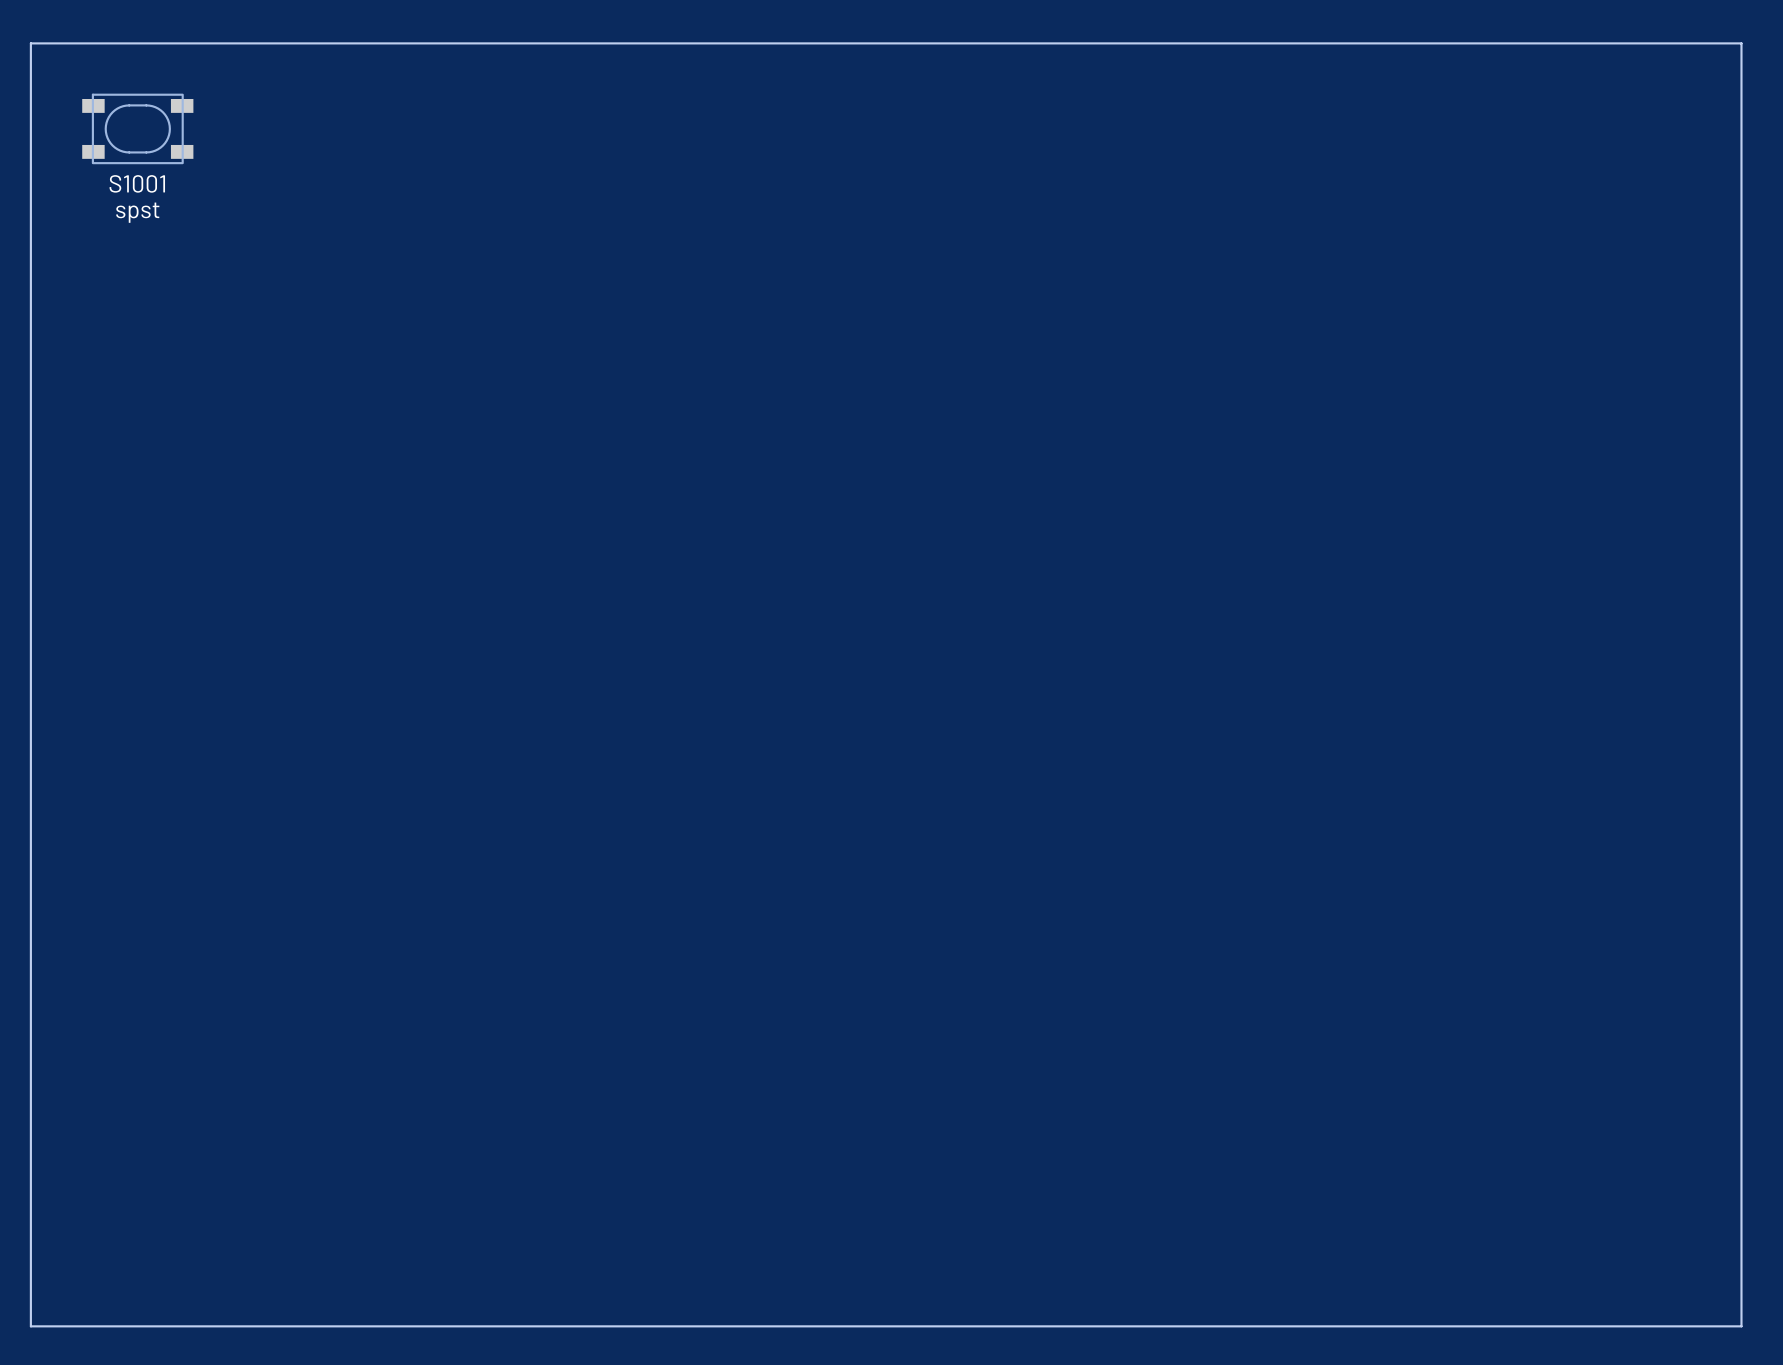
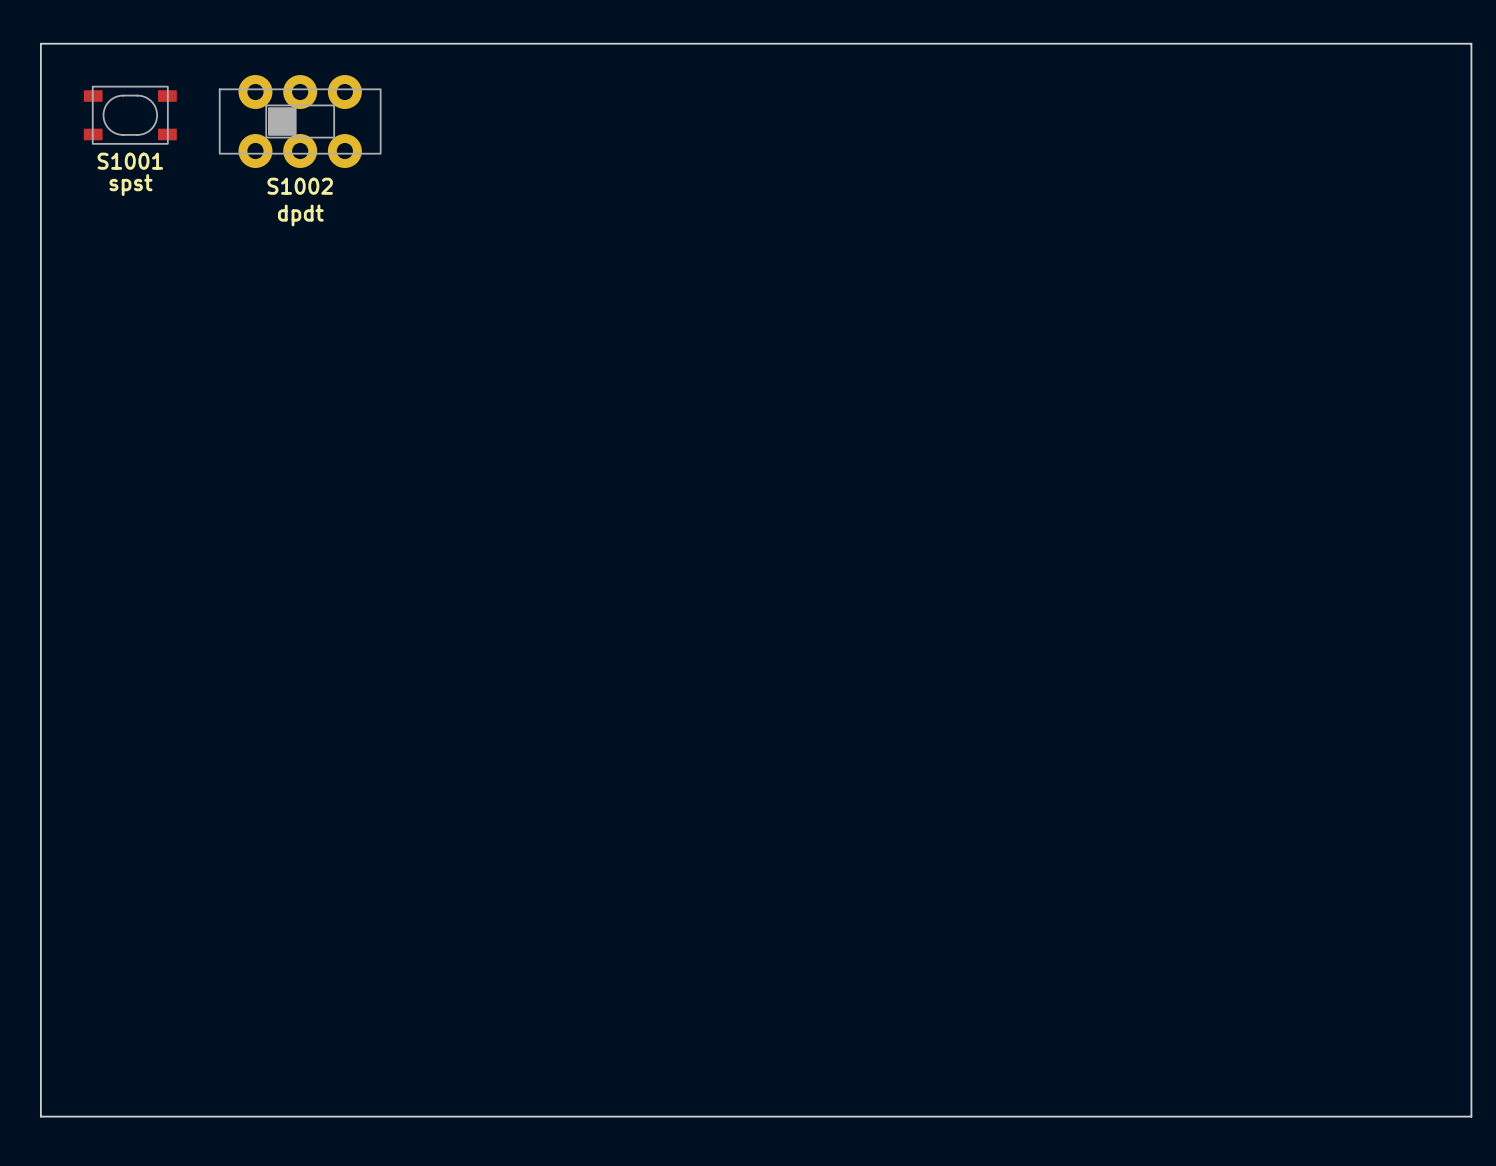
S1002: none -> dpdt (300, 121)

